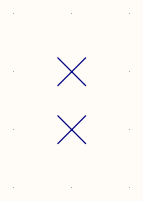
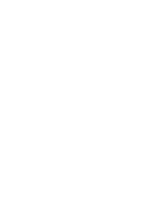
no-connect mark: (71, 71) -> none
no-connect mark: (71, 129) -> none

